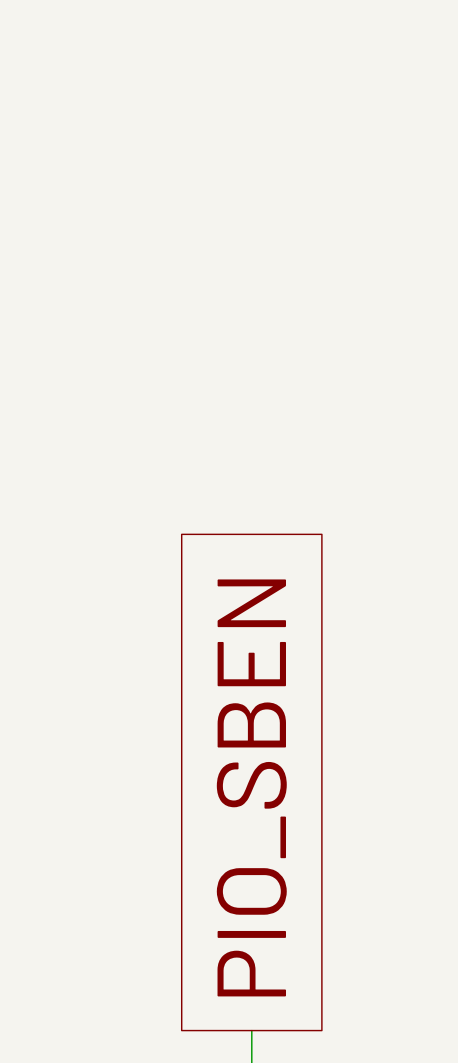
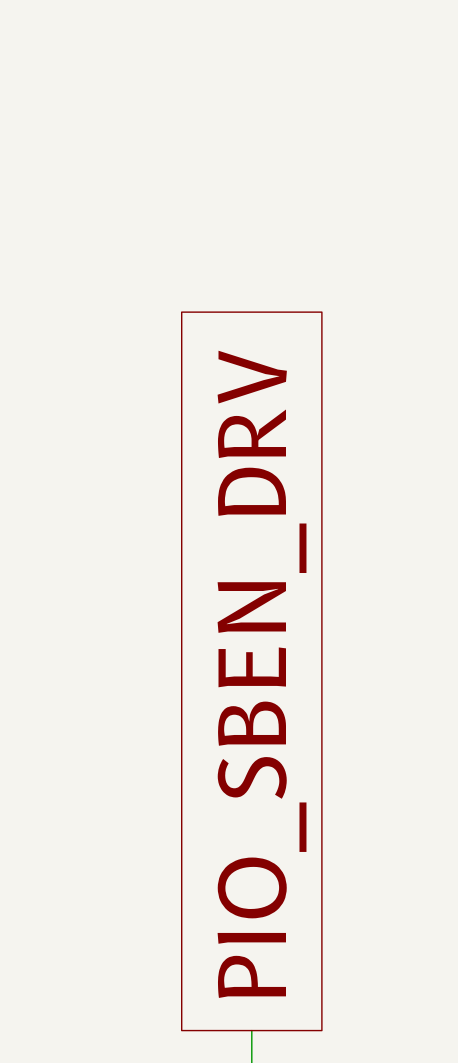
global label: PIO_SBEN (251, 787) -> PIO_SBEN_DRV (262, 674)

